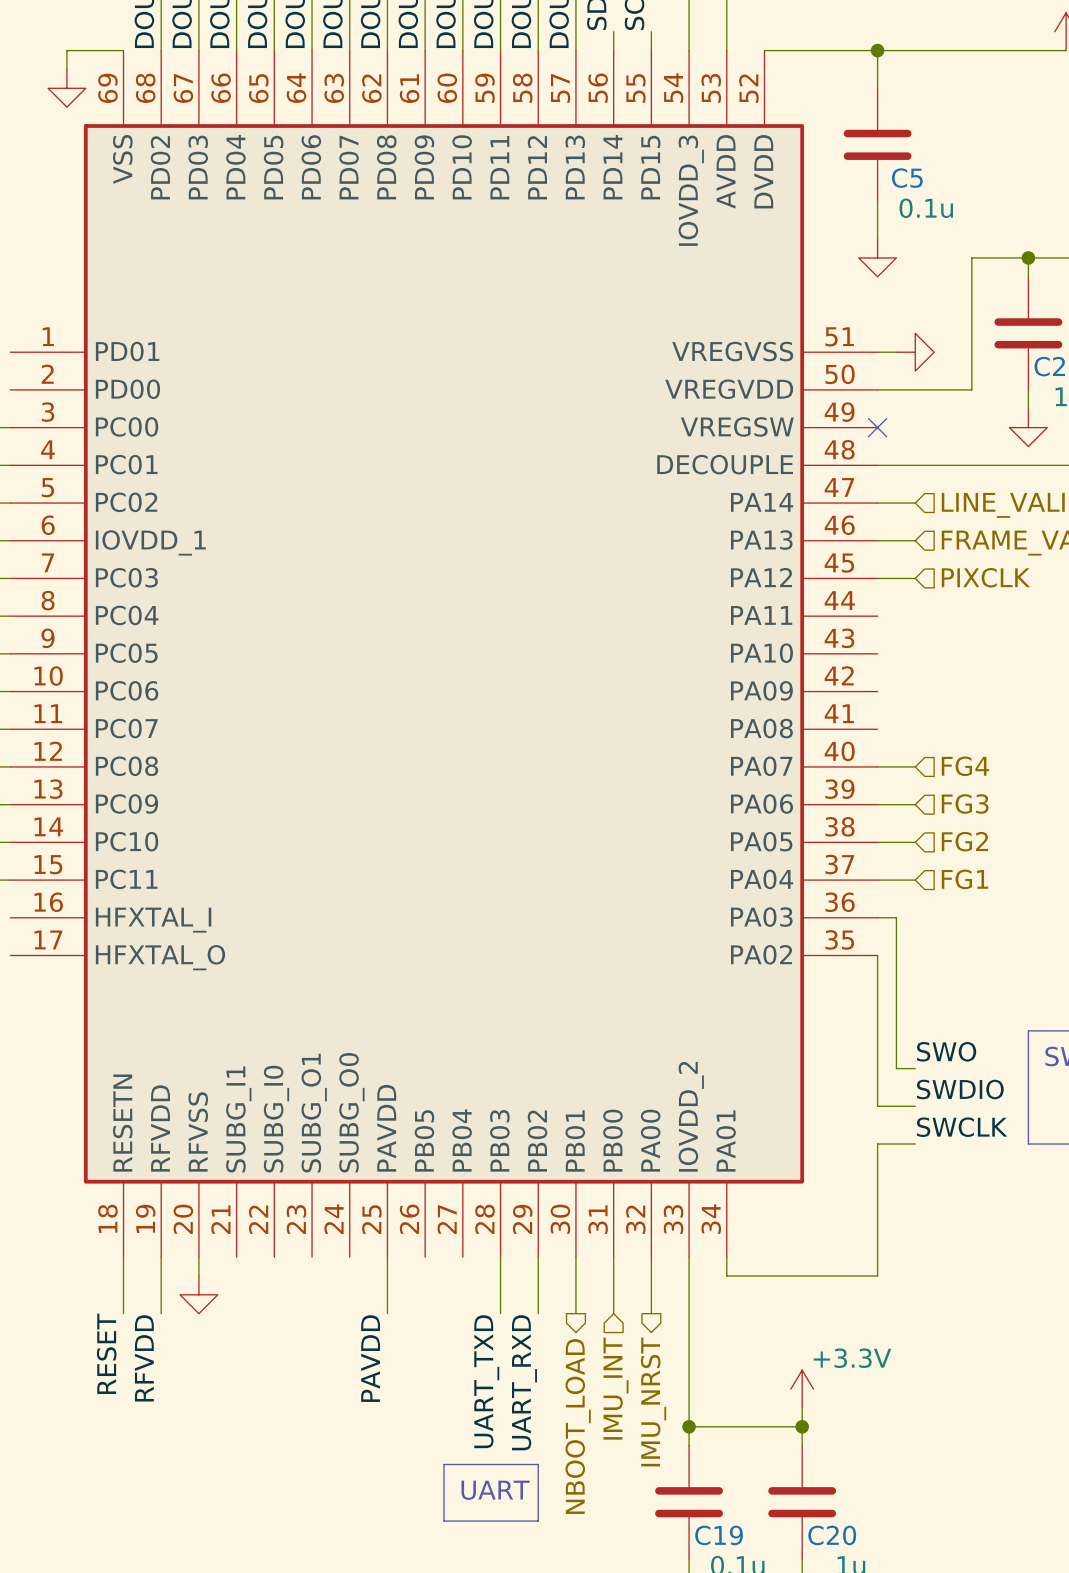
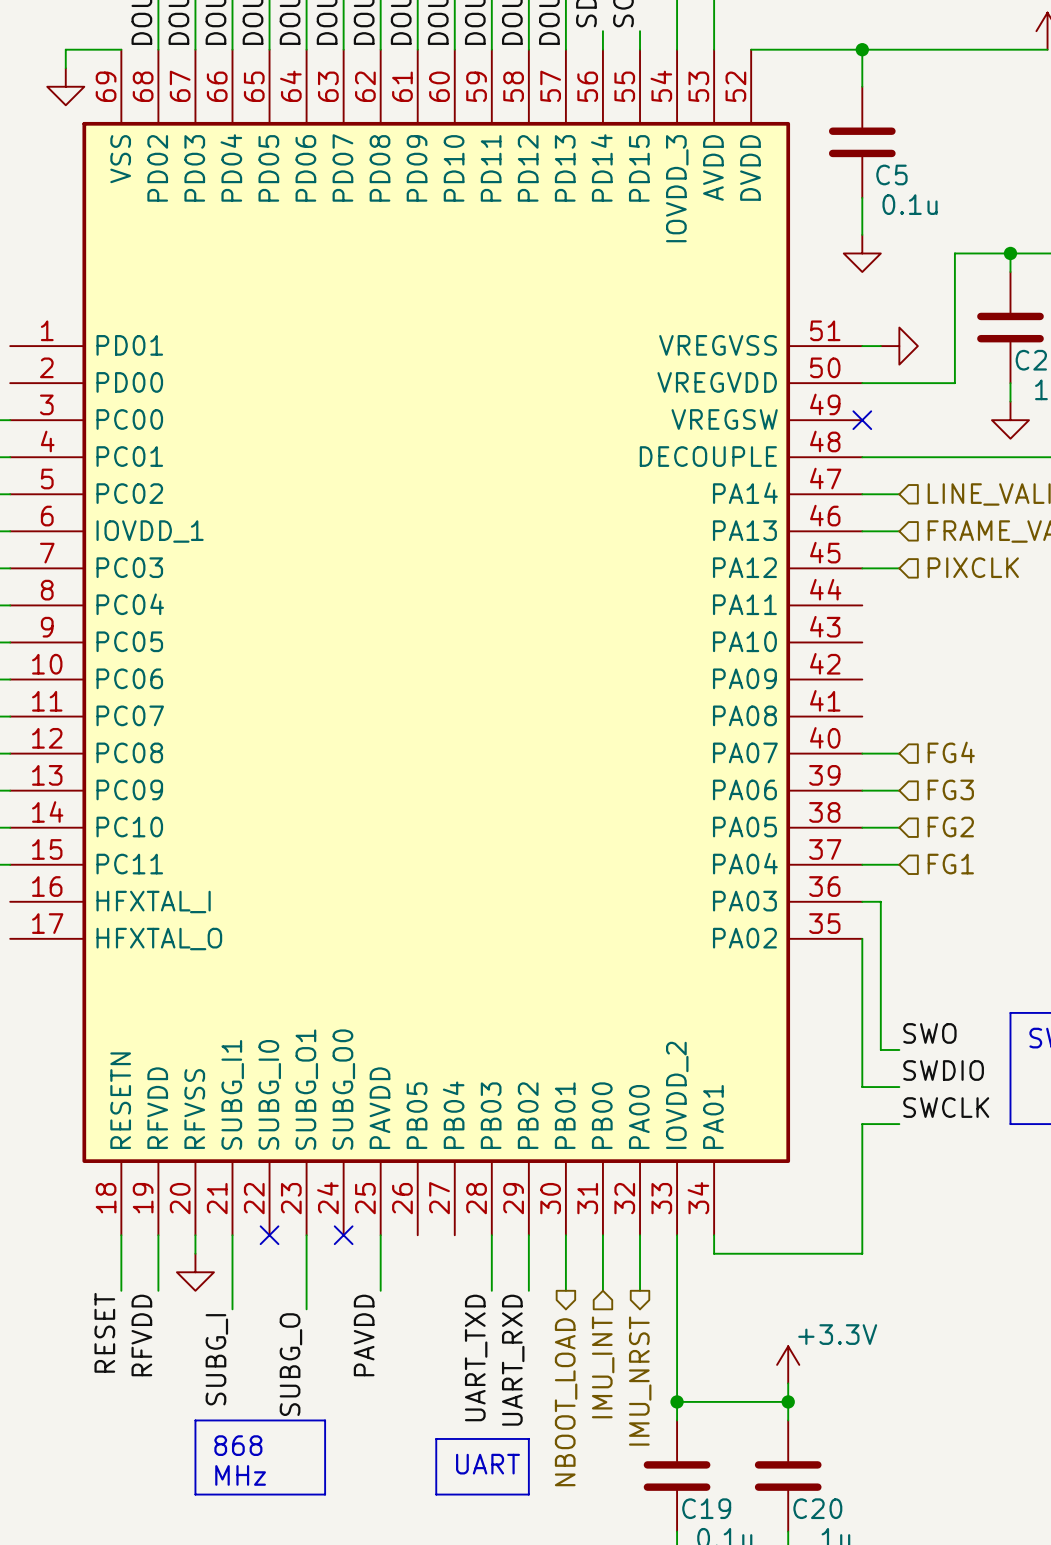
wire: none -> (232, 1235) (232, 1309)
no-connect mark: none -> (269, 1235)
wire: none -> (306, 1235) (306, 1309)
no-connect mark: none -> (343, 1235)
label: none -> SUBG_I (216, 1359)
label: none -> SUBG_O (290, 1364)
line: none -> (195, 1420) (325, 1420) (325, 1494) (195, 1494) (195, 1420)
text: none -> 868 (238, 1445)
text: none -> MHz (240, 1475)

